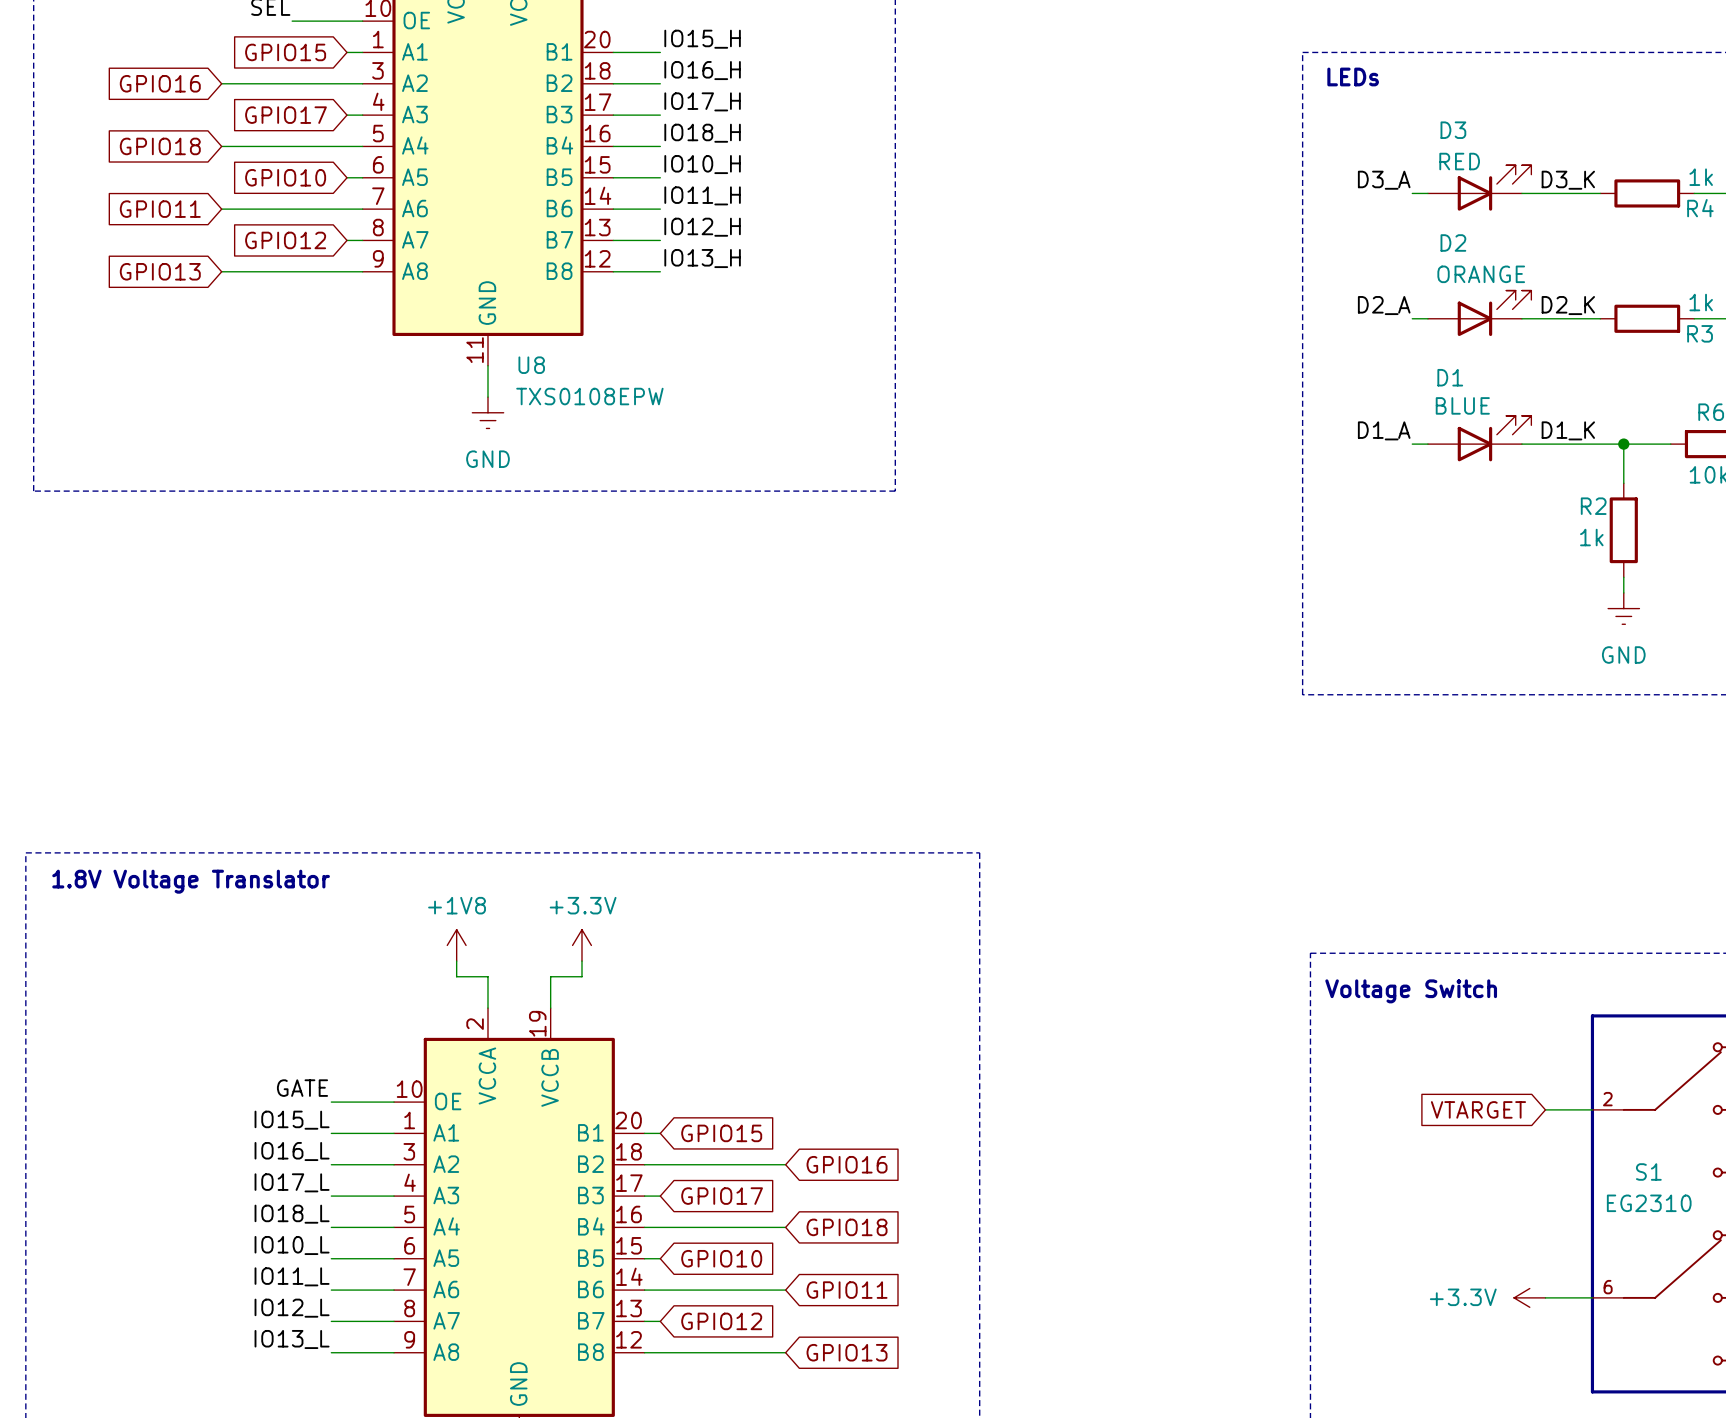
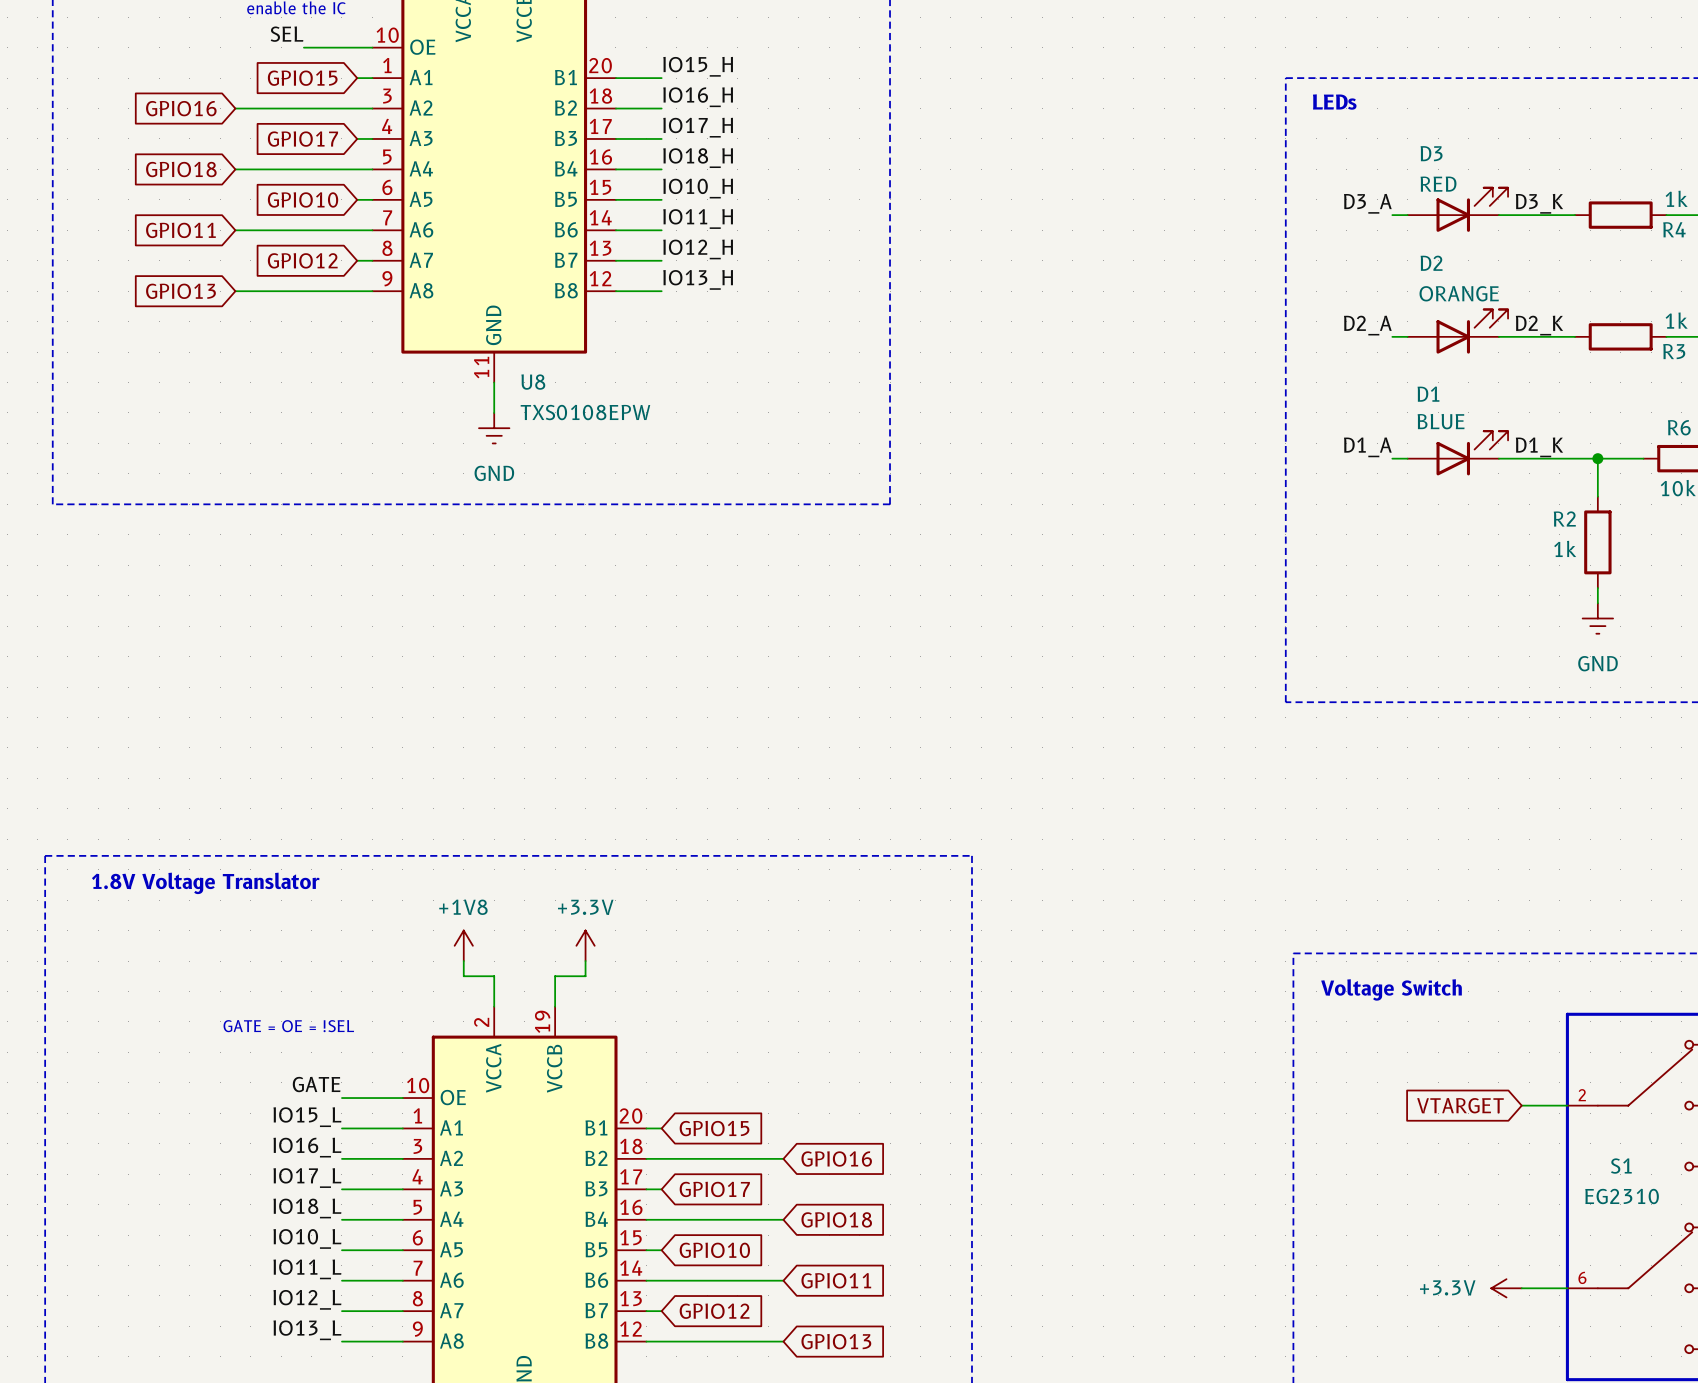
text: none -> GATE = OE = !SEL (288, 1026)

